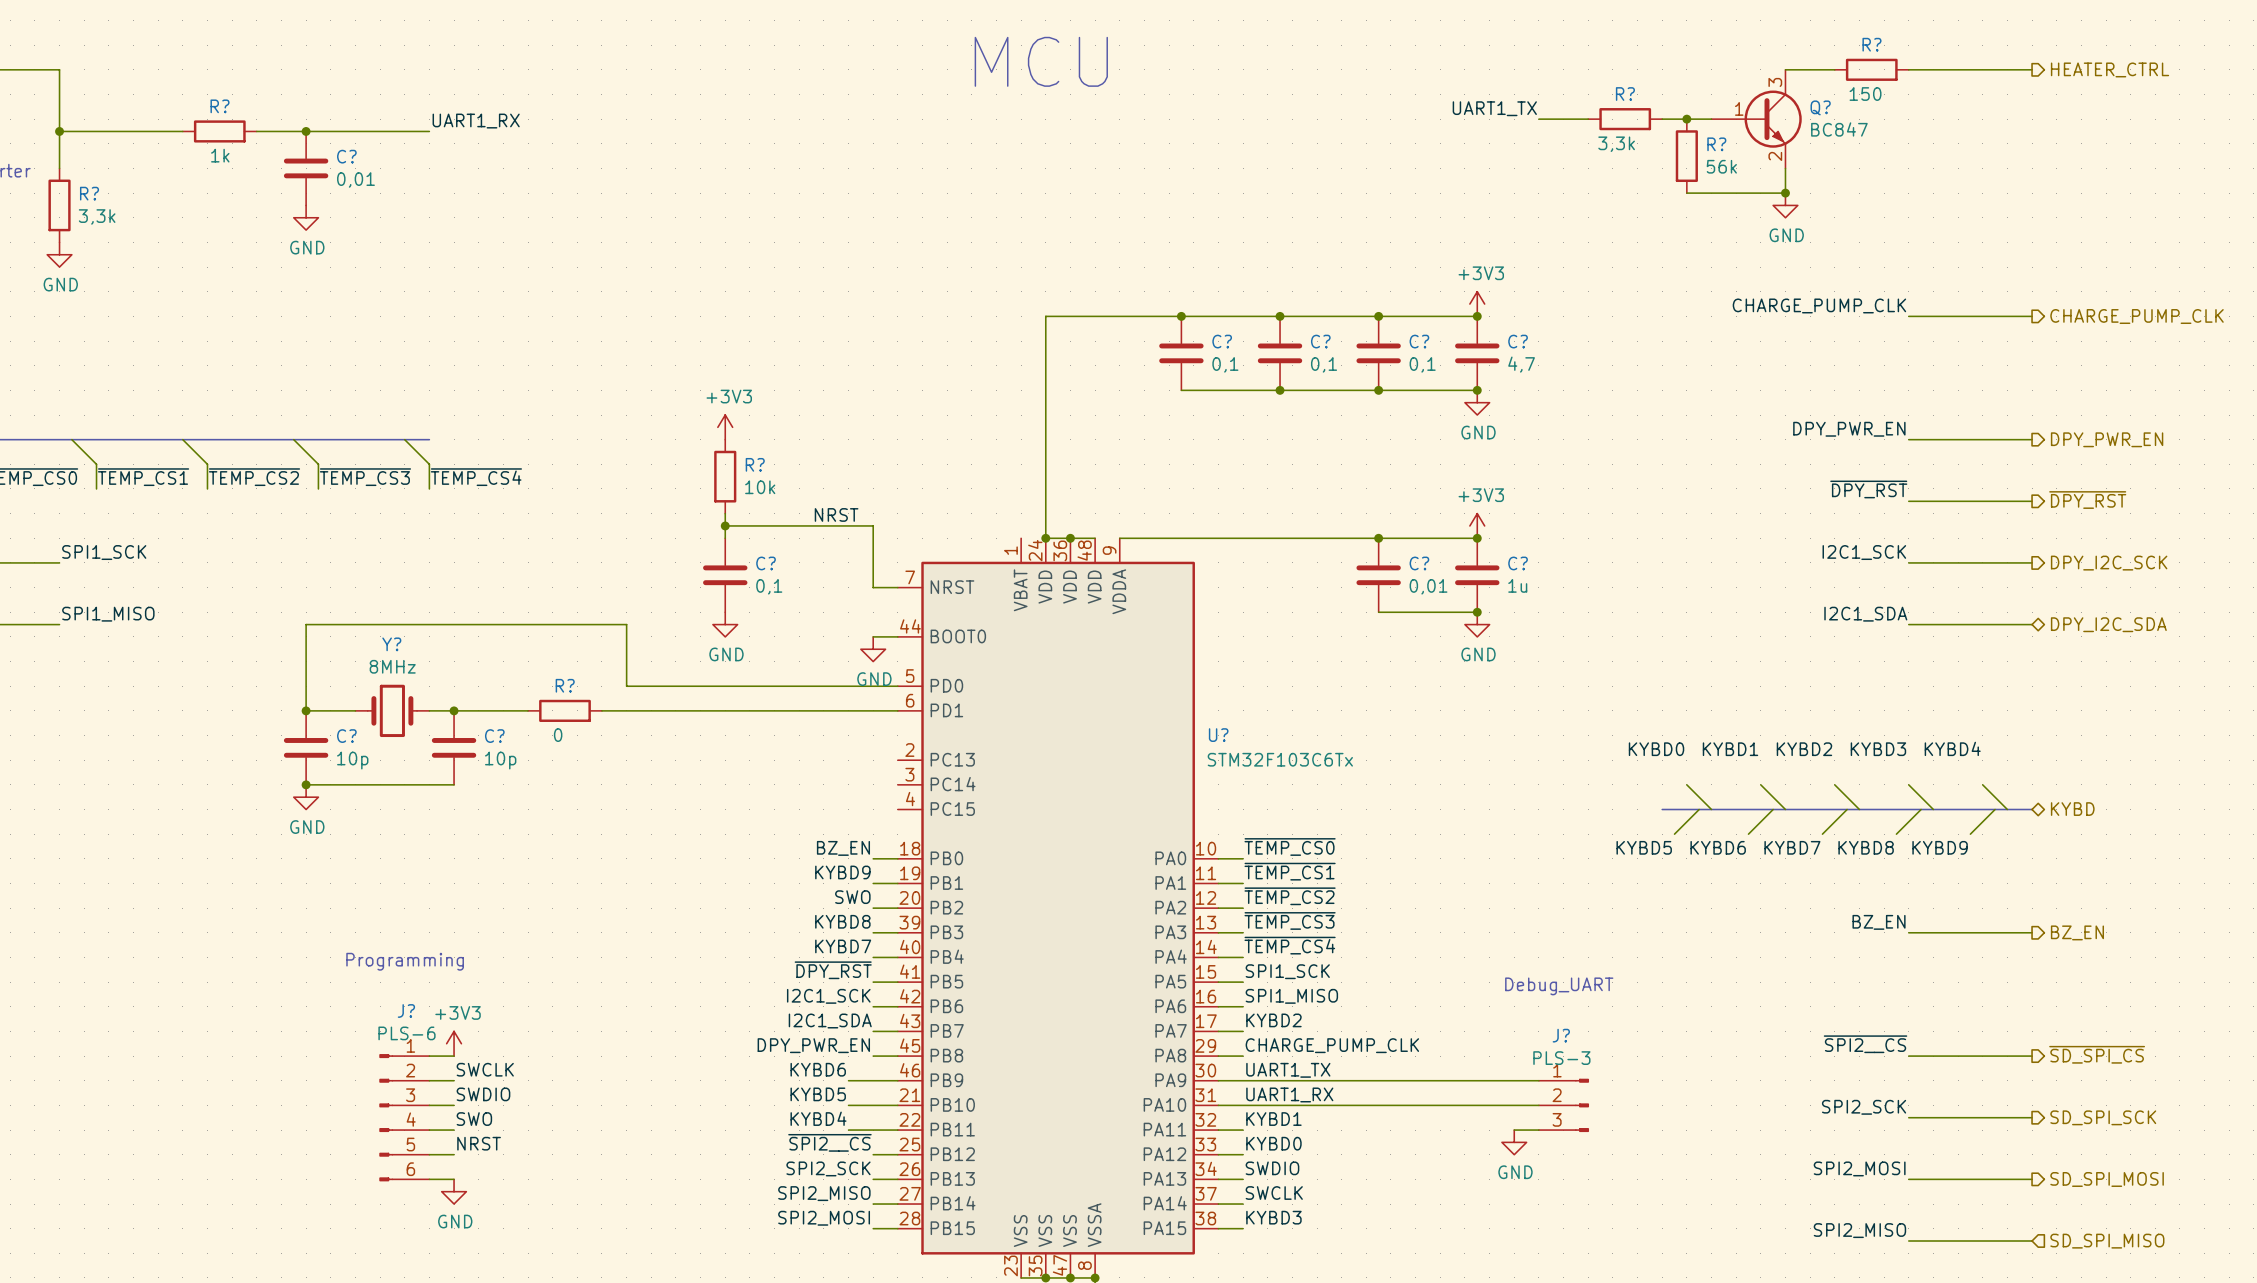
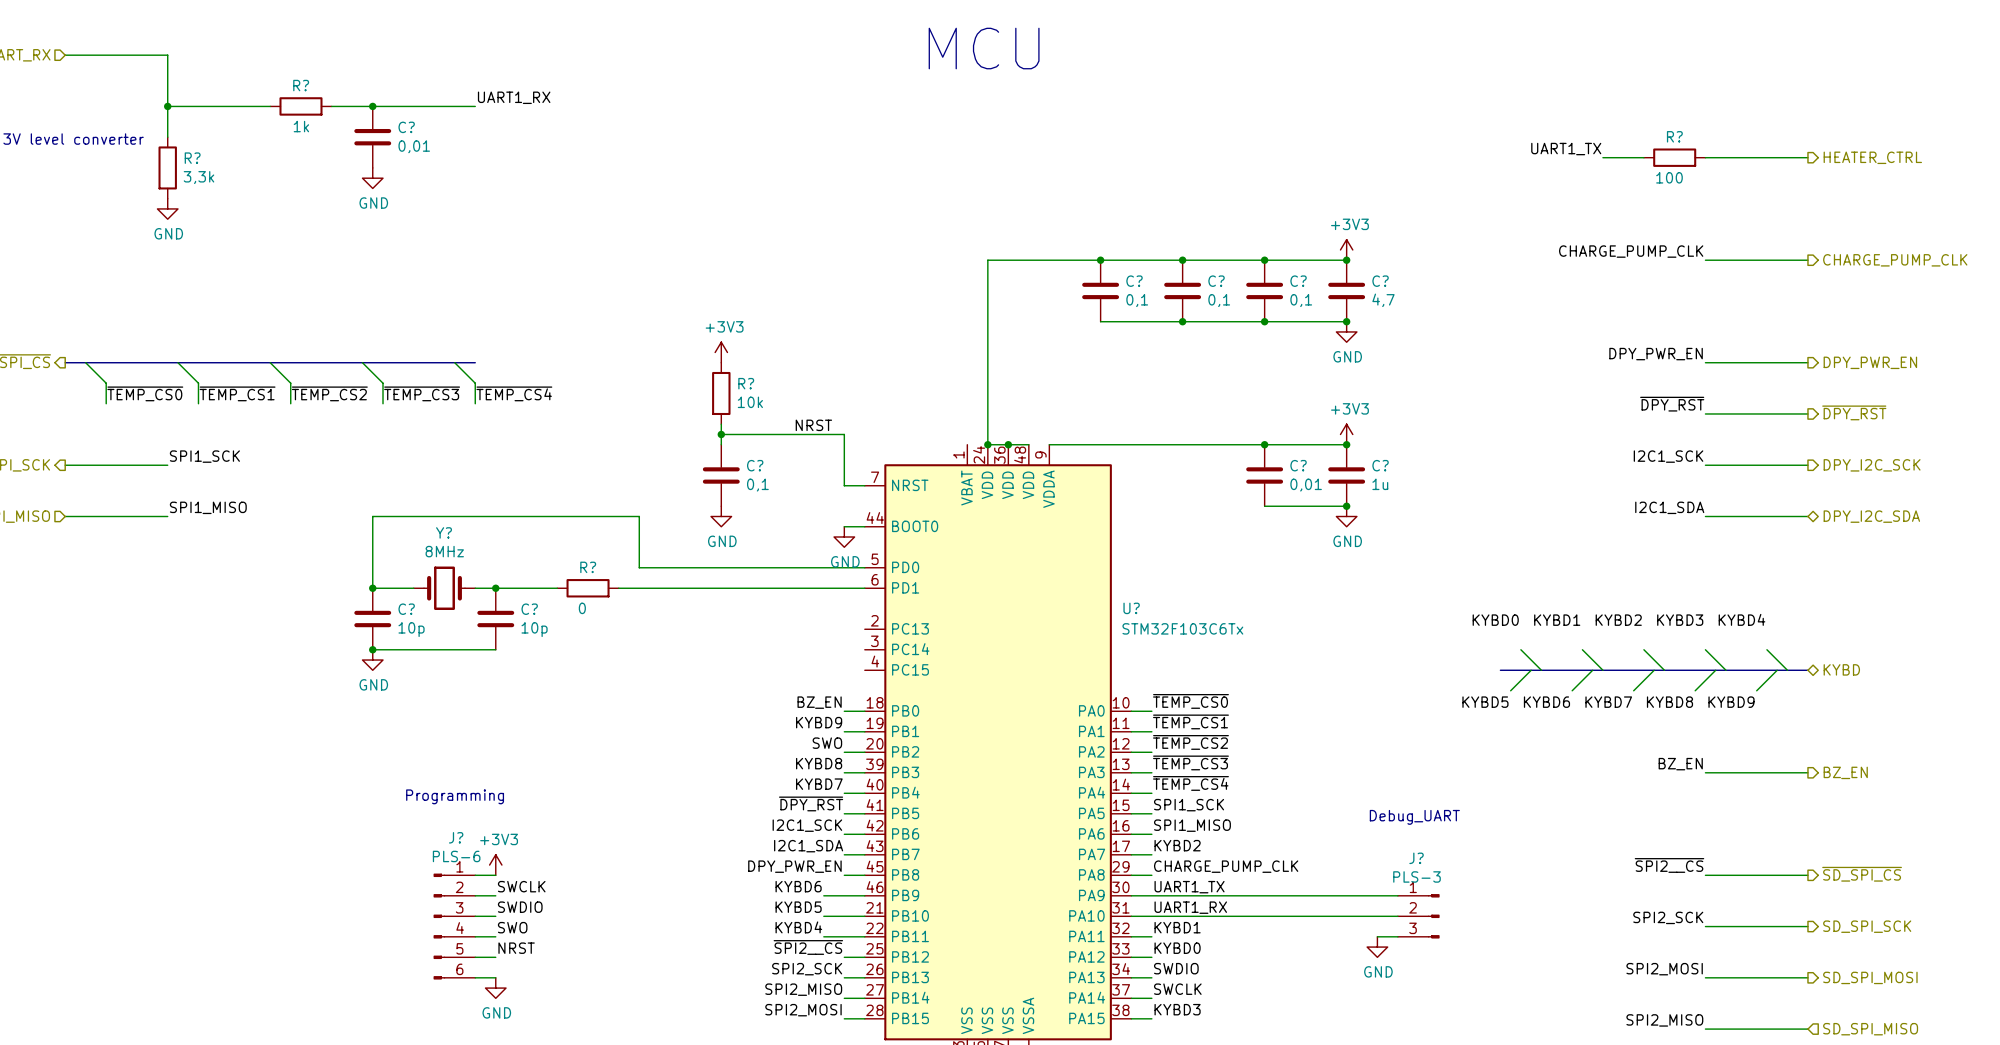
wire: (1785, 69) (1834, 69) -> (1602, 157) (1643, 157)
R?: 150 (1871, 69) -> none
wire: (1908, 69) (2032, 69) -> (1705, 157) (1807, 157)
hierarchical label position: HEATER_CTRL (2110, 69) -> HEATER_CTRL (1872, 157)
label: UART1_TX (1494, 108) -> none
wire: (1538, 119) (1588, 119) -> none
R?: 3,3k (1625, 119) -> none
wire: (1662, 119) (1711, 119) -> none
junction: (1686, 119) -> none
Q?: BC847 (1756, 119) -> none
R?: 56k (1686, 156) -> none
wire: (1785, 168) (1785, 193) (1686, 193) -> none
label: none -> UART1_TX (1566, 149)
junction: (1785, 193) -> none
R?: none -> 100 (1674, 157)
power symbol: GND (1785, 205) -> none

